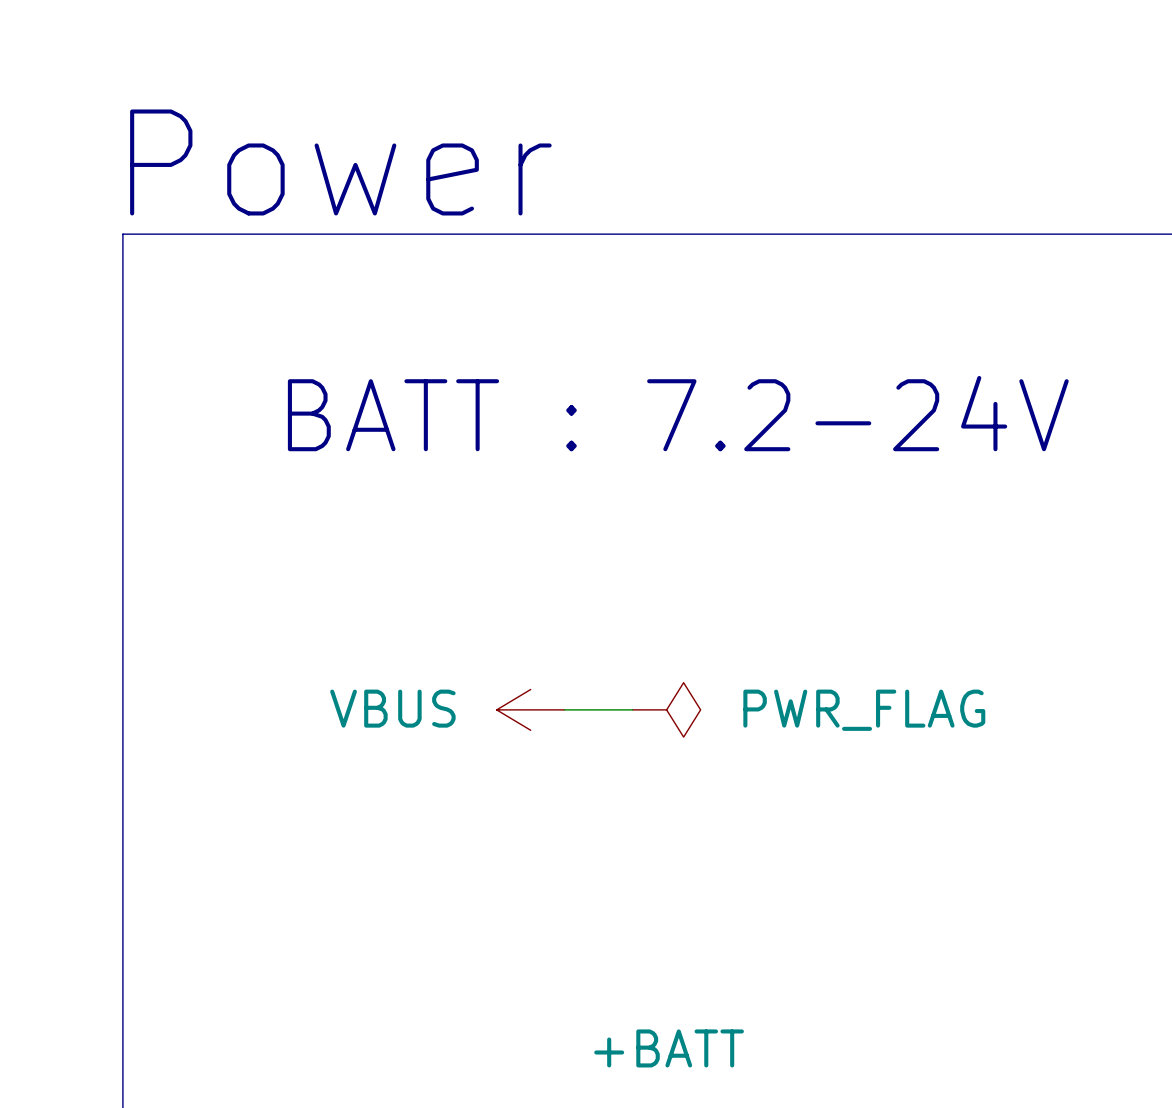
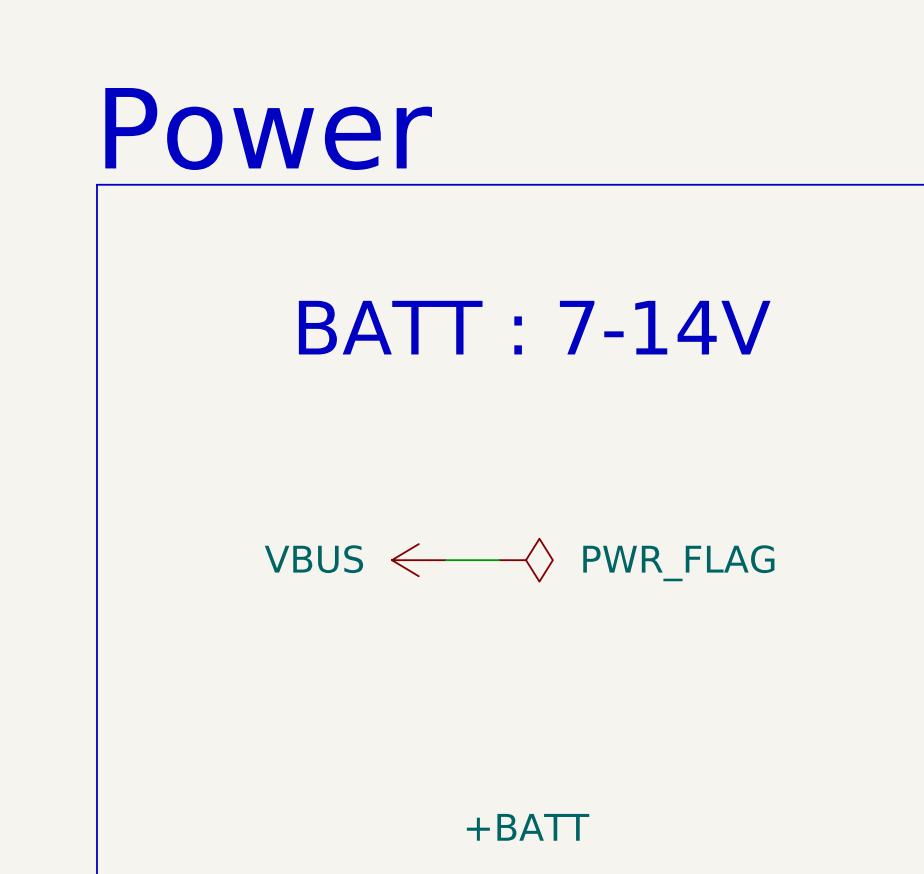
text: BATT : 7.2-24V (678, 413) -> BATT : 7-14V (534, 327)

